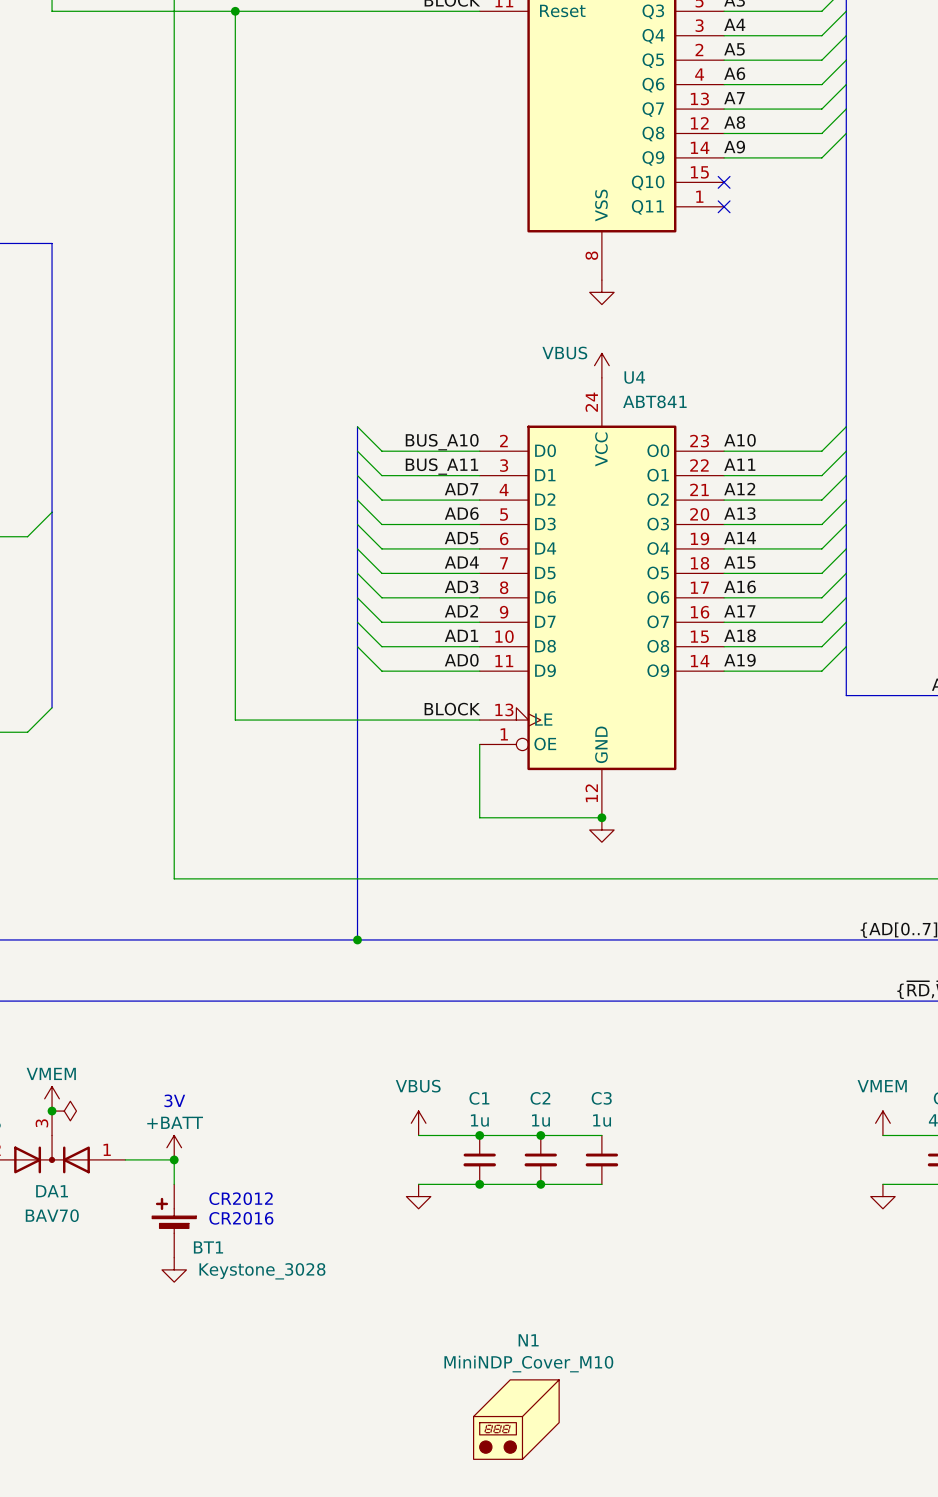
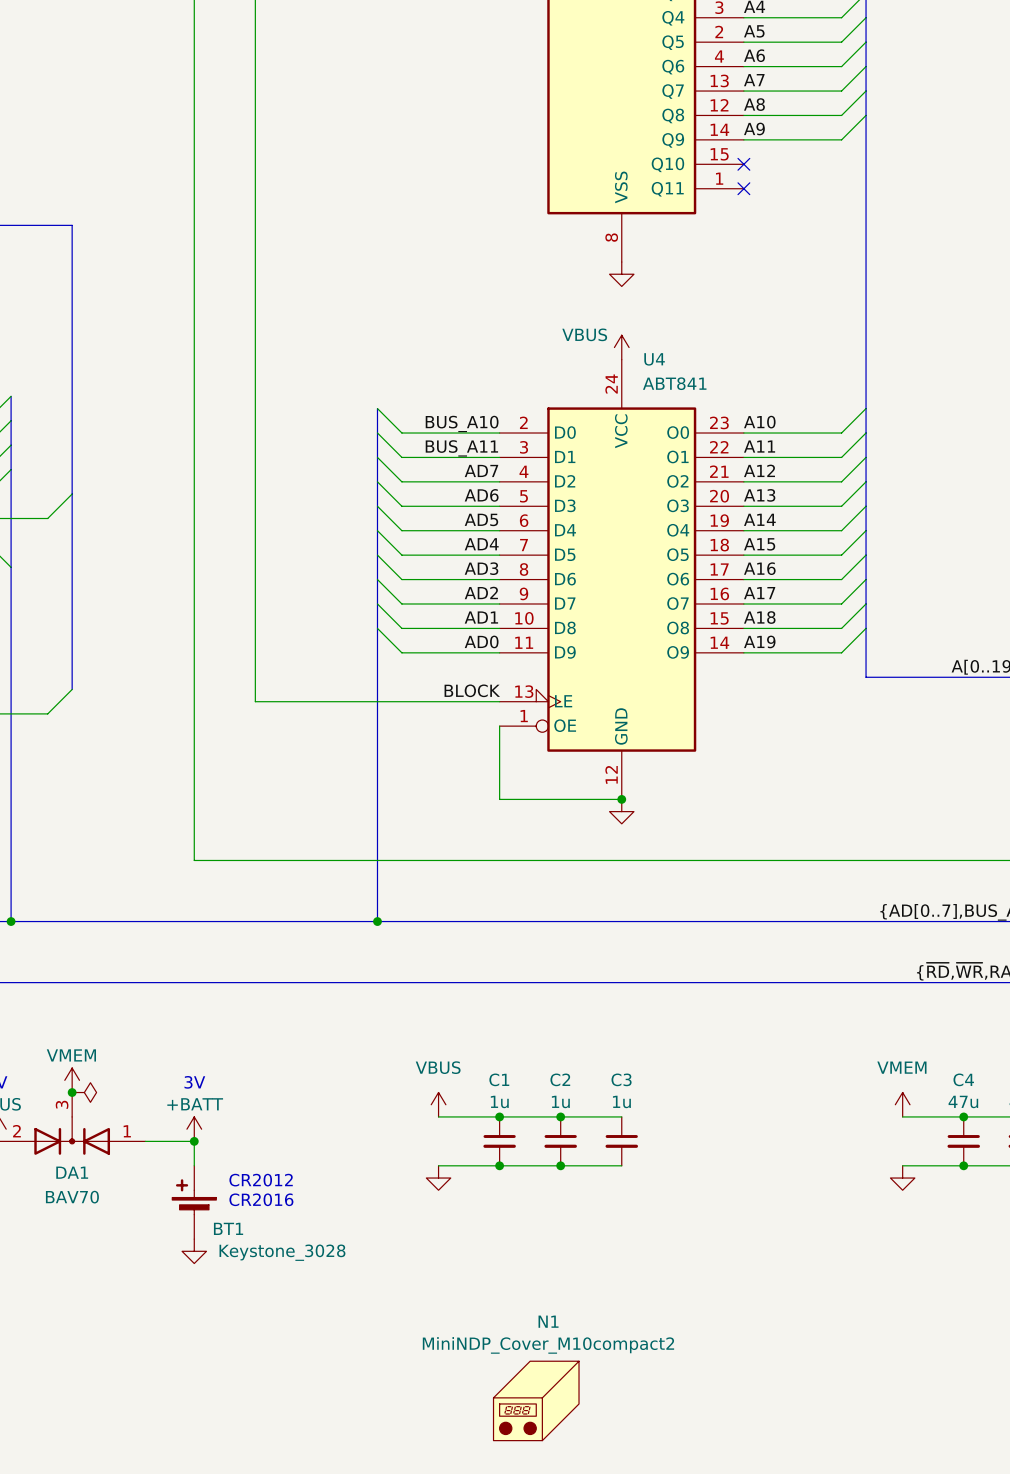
N1 value: MiniNDP_Cover_M10 (528, 1364) -> MiniNDP_Cover_M10compact2 (548, 1345)

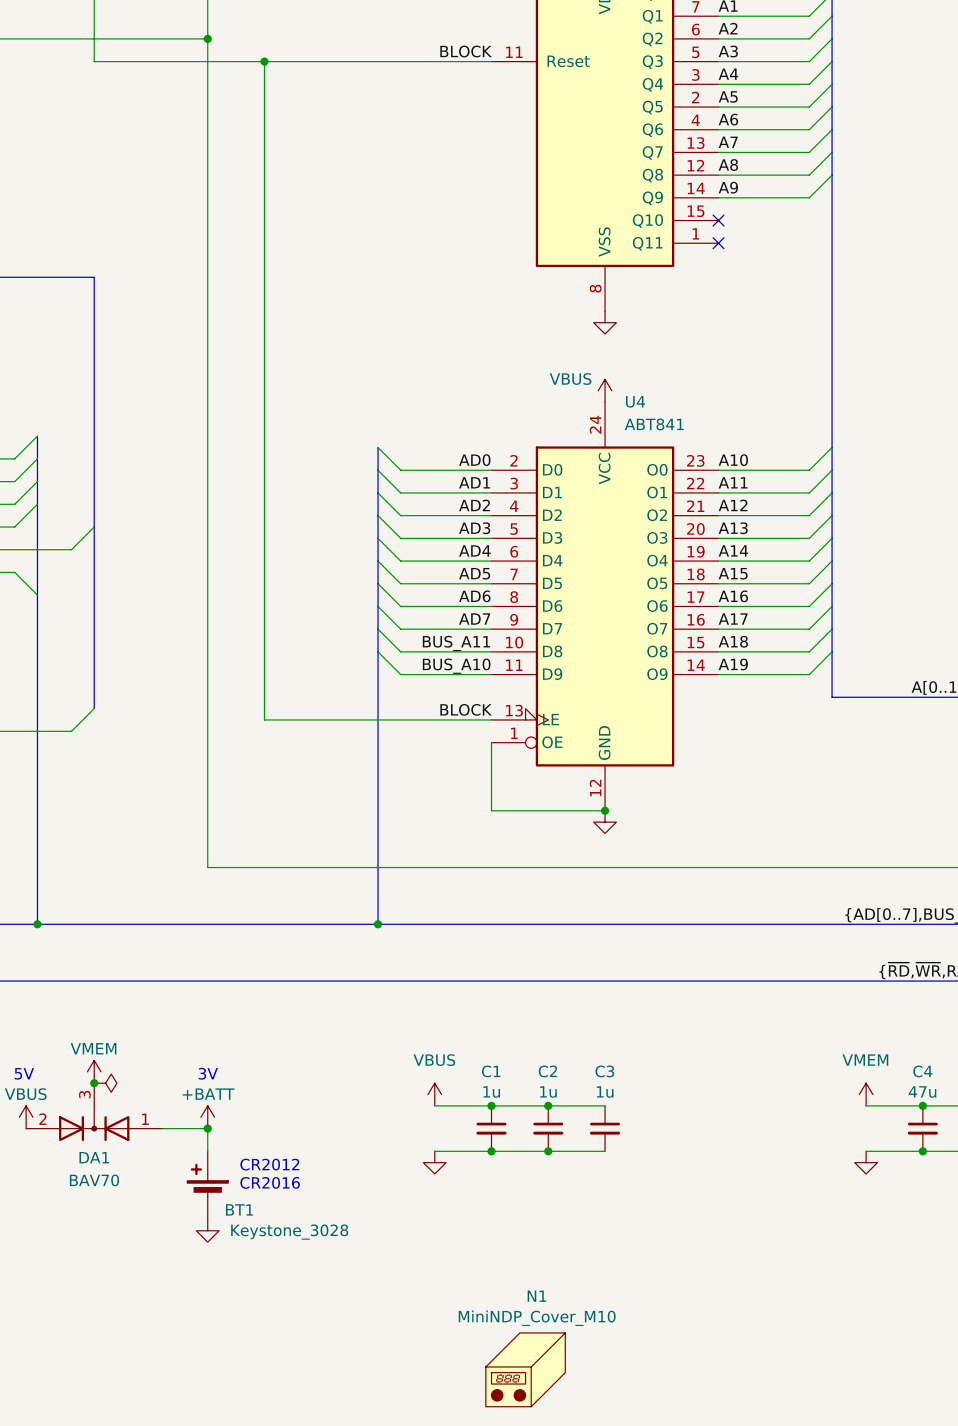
label: BUS_A10 (462, 423) -> AD0 (474, 460)
label: BUS_A11 (461, 448) -> AD1 (474, 482)
label: AD7 (481, 470) -> AD2 (474, 505)
label: AD6 (481, 495) -> AD3 (474, 528)
label: AD5 (481, 519) -> AD4 (474, 550)
label: AD4 (481, 544) -> AD5 (474, 573)
label: AD3 (481, 568) -> AD6 (474, 596)
label: AD2 (481, 592) -> AD7 (474, 619)
label: AD1 (481, 617) -> BUS_A11 (456, 643)
label: AD0 (481, 641) -> BUS_A10 (456, 666)
N1 value: MiniNDP_Cover_M10compact2 (548, 1345) -> MiniNDP_Cover_M10 (537, 1318)

